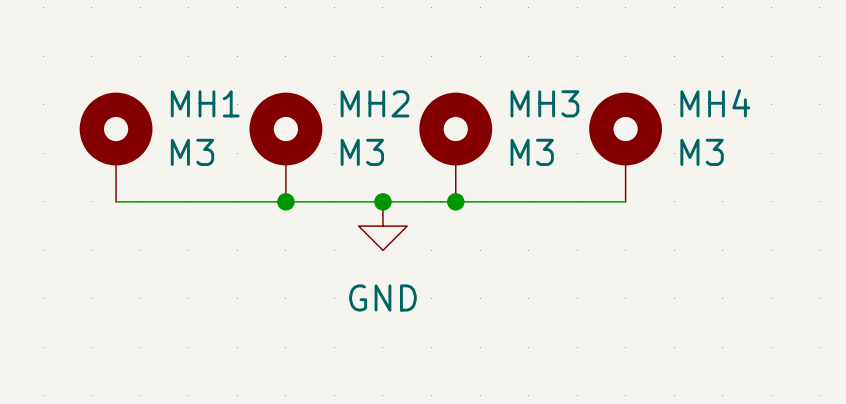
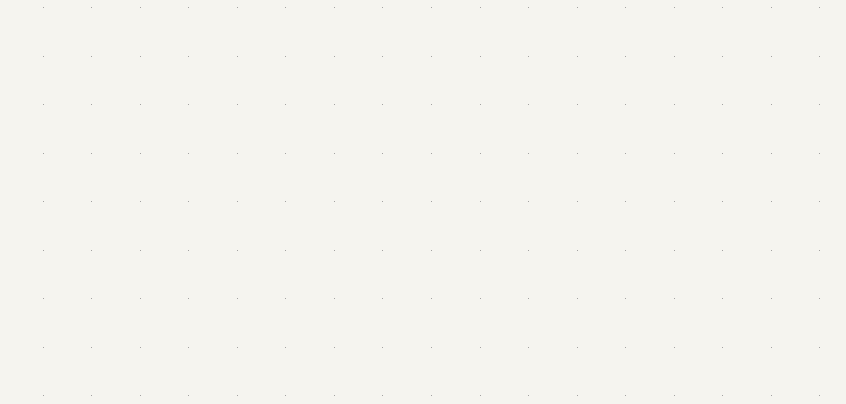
MH1: M3 (116, 147) -> none
MH2: M3 (285, 147) -> none
MH3: M3 (455, 147) -> none
MH4: M3 (625, 147) -> none
wire: (116, 201) (625, 201) -> none
junction: (285, 201) -> none
junction: (382, 201) -> none
junction: (455, 201) -> none
power symbol: GND (382, 226) -> none

